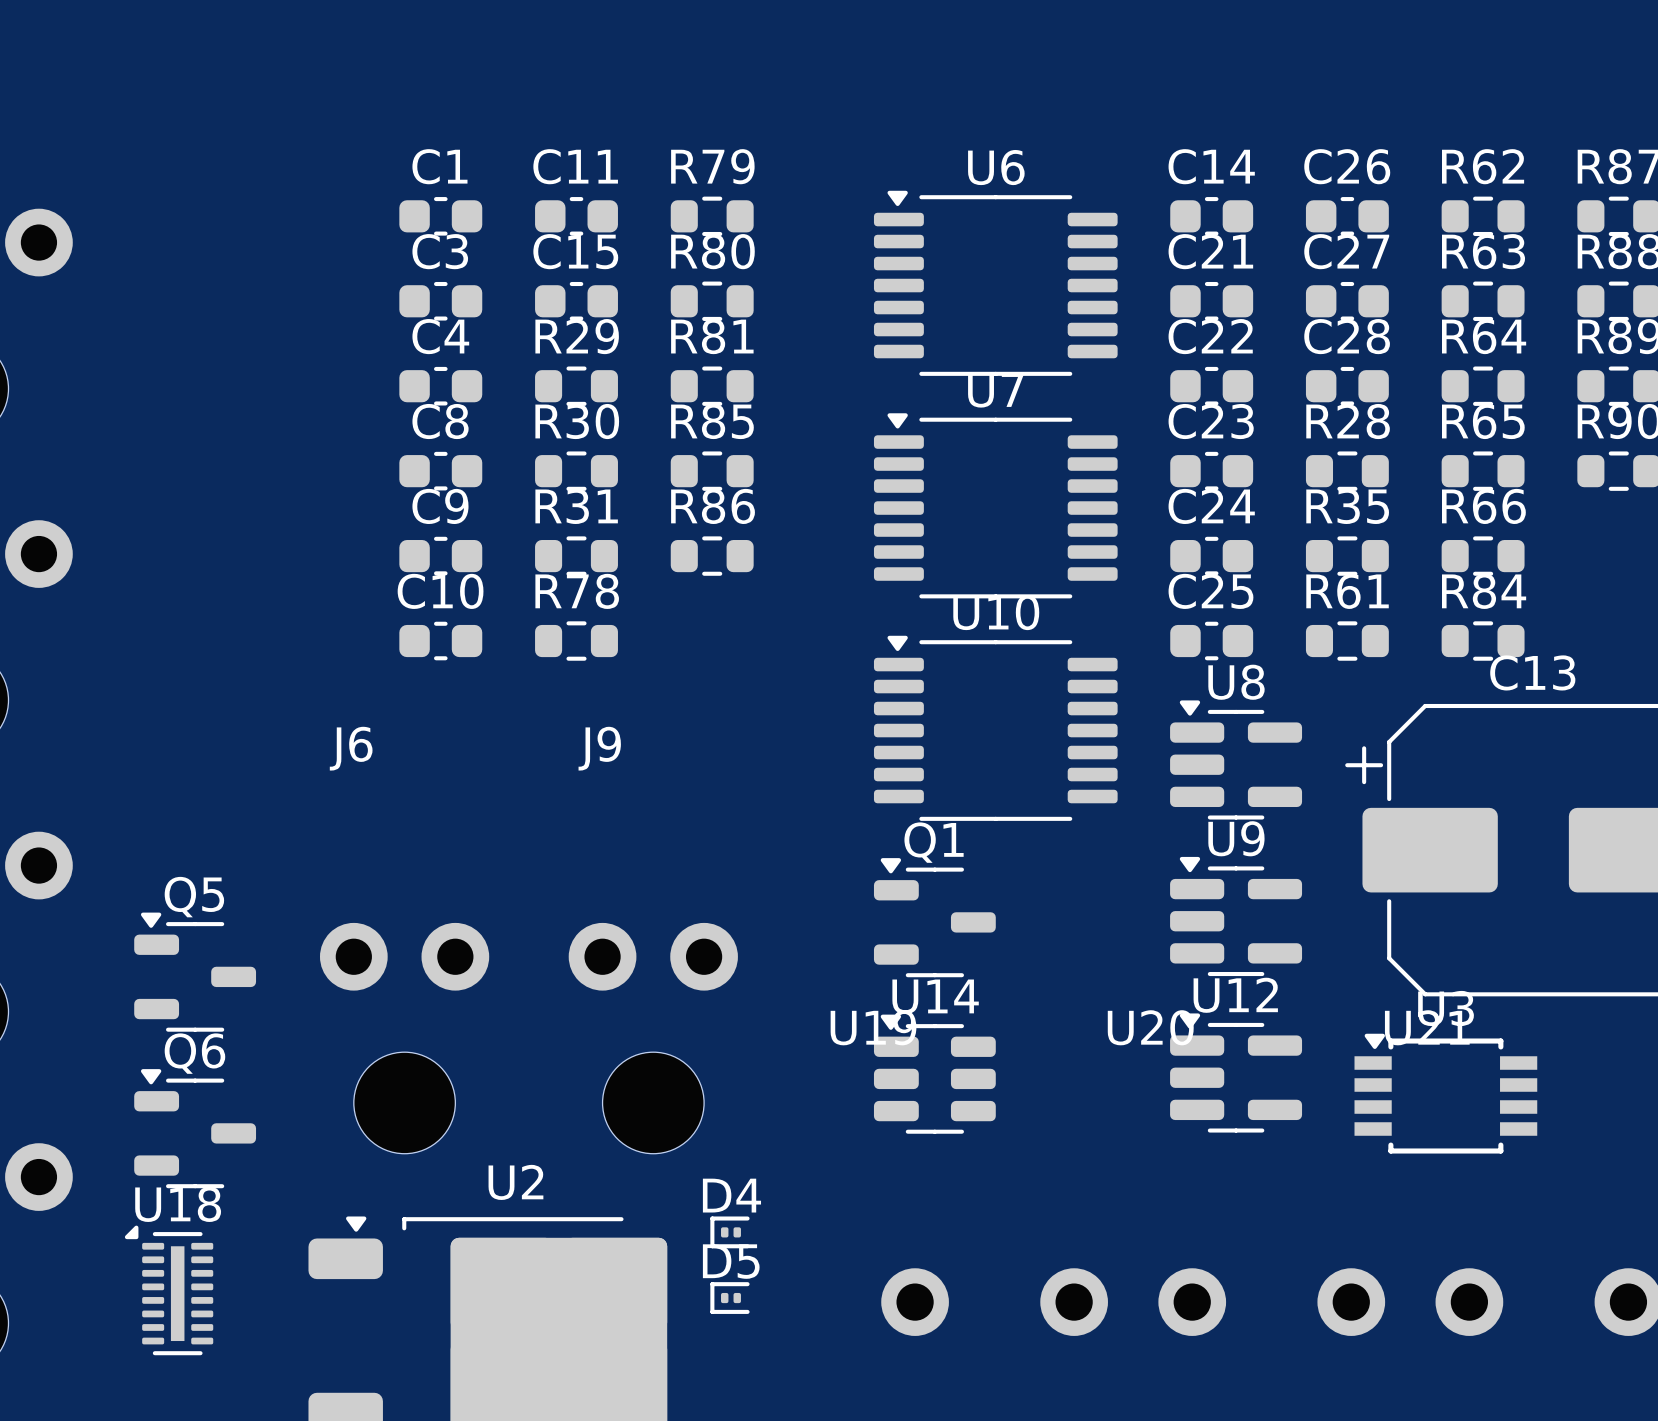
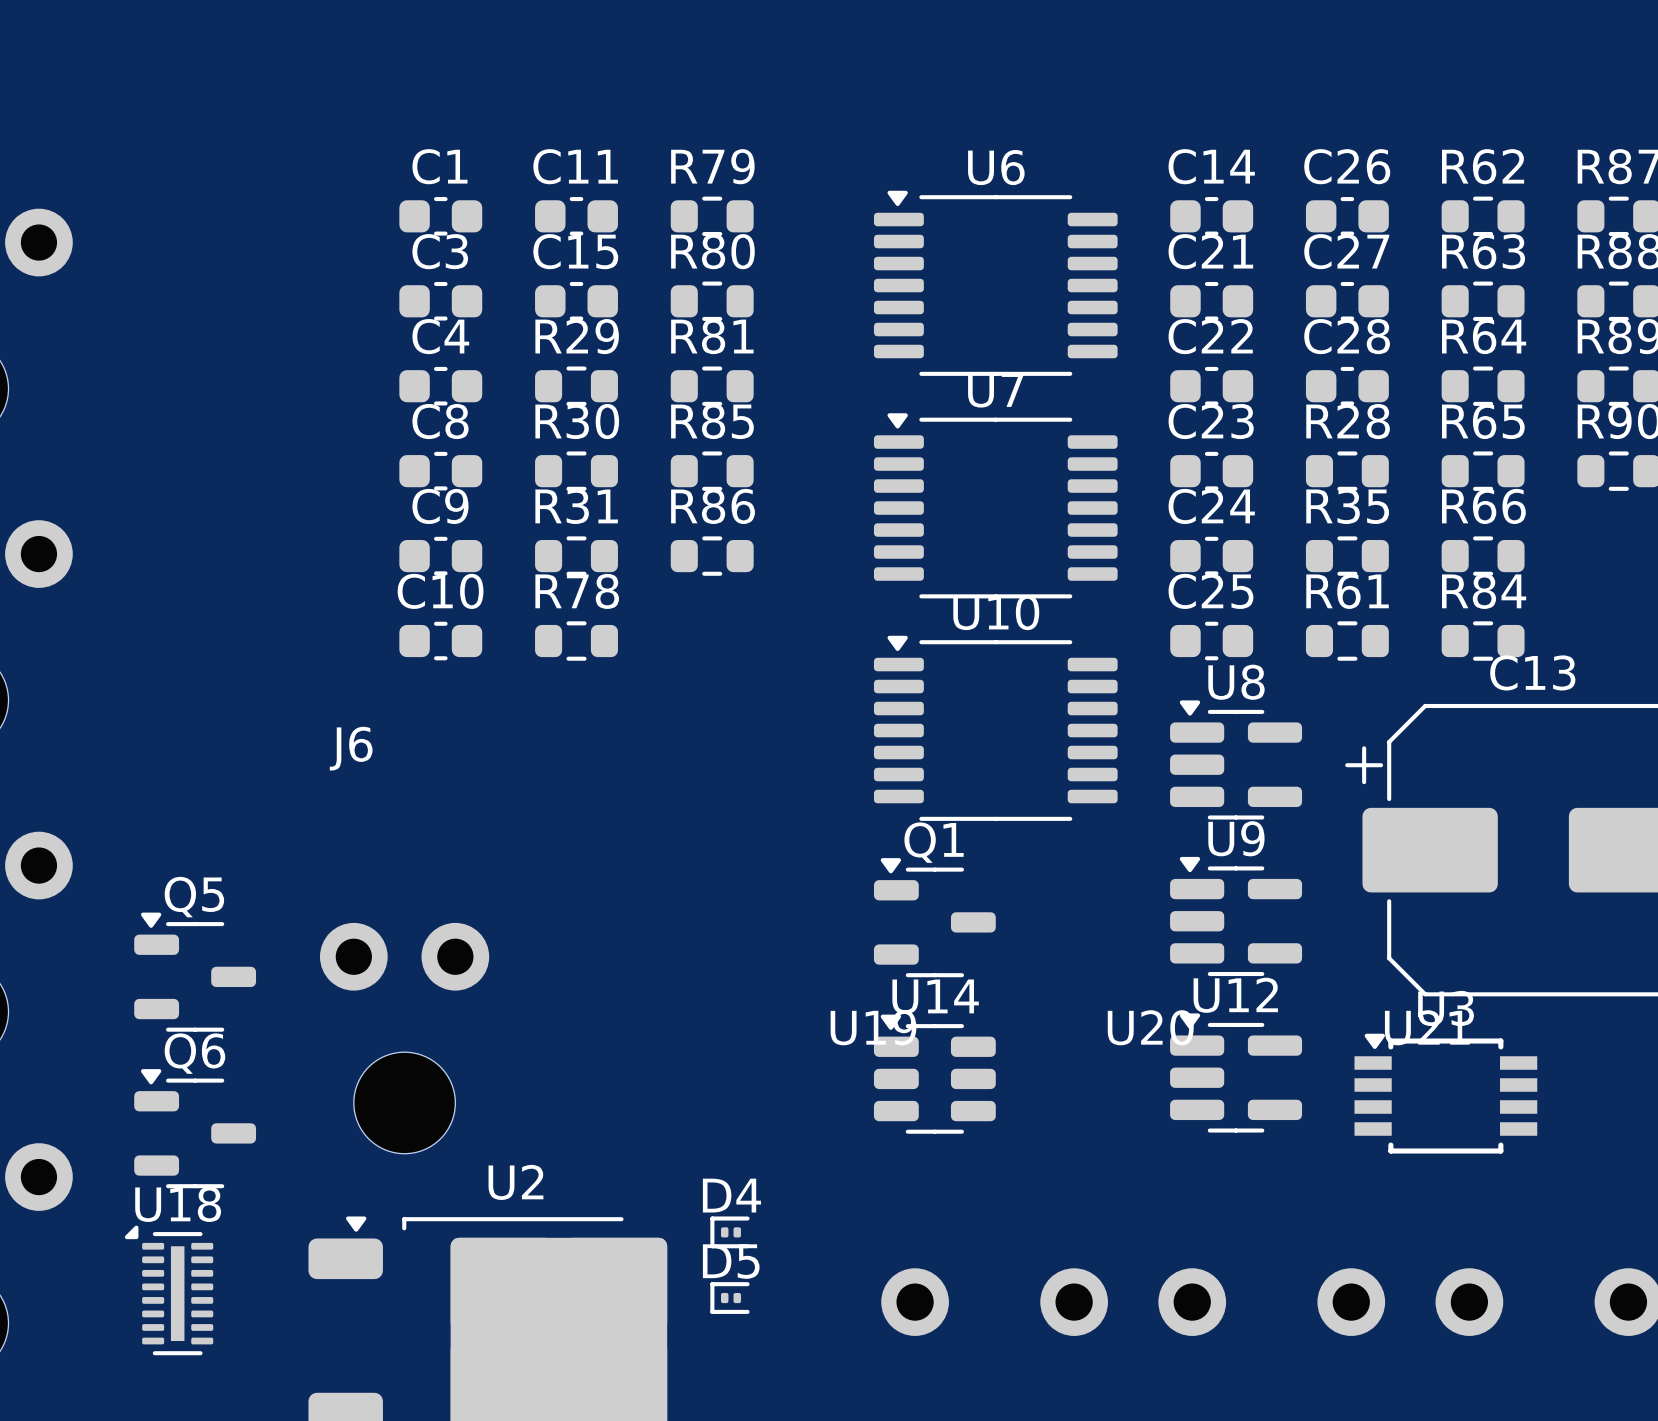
J9: (653, 1038) -> none

